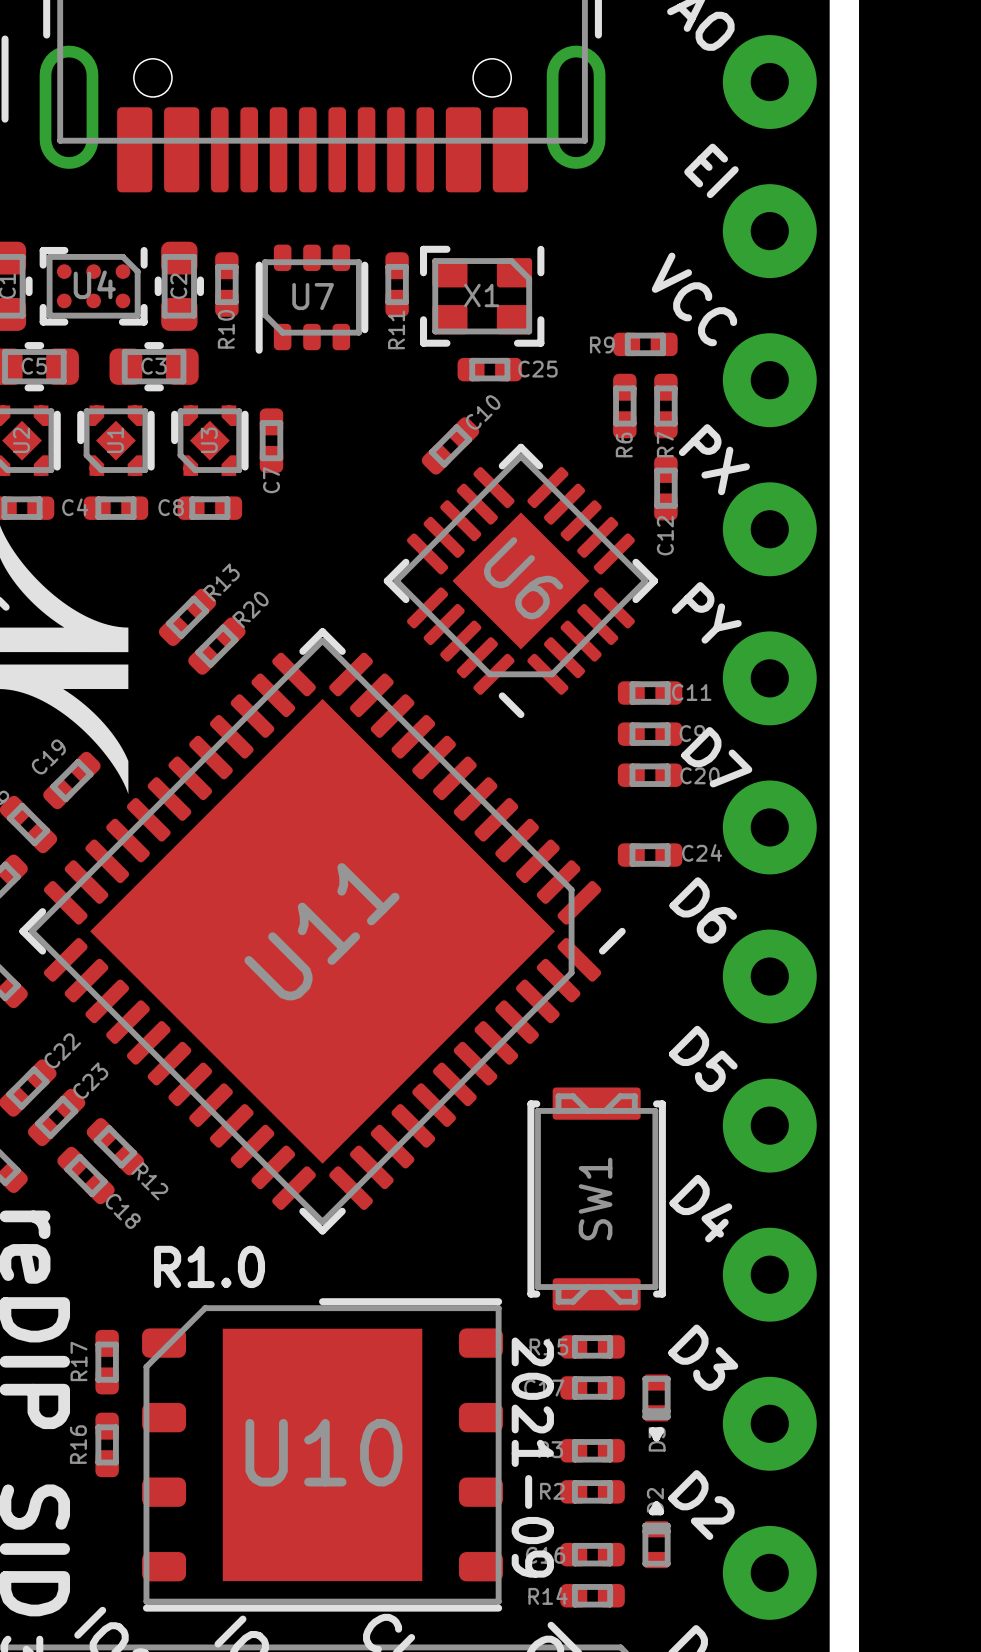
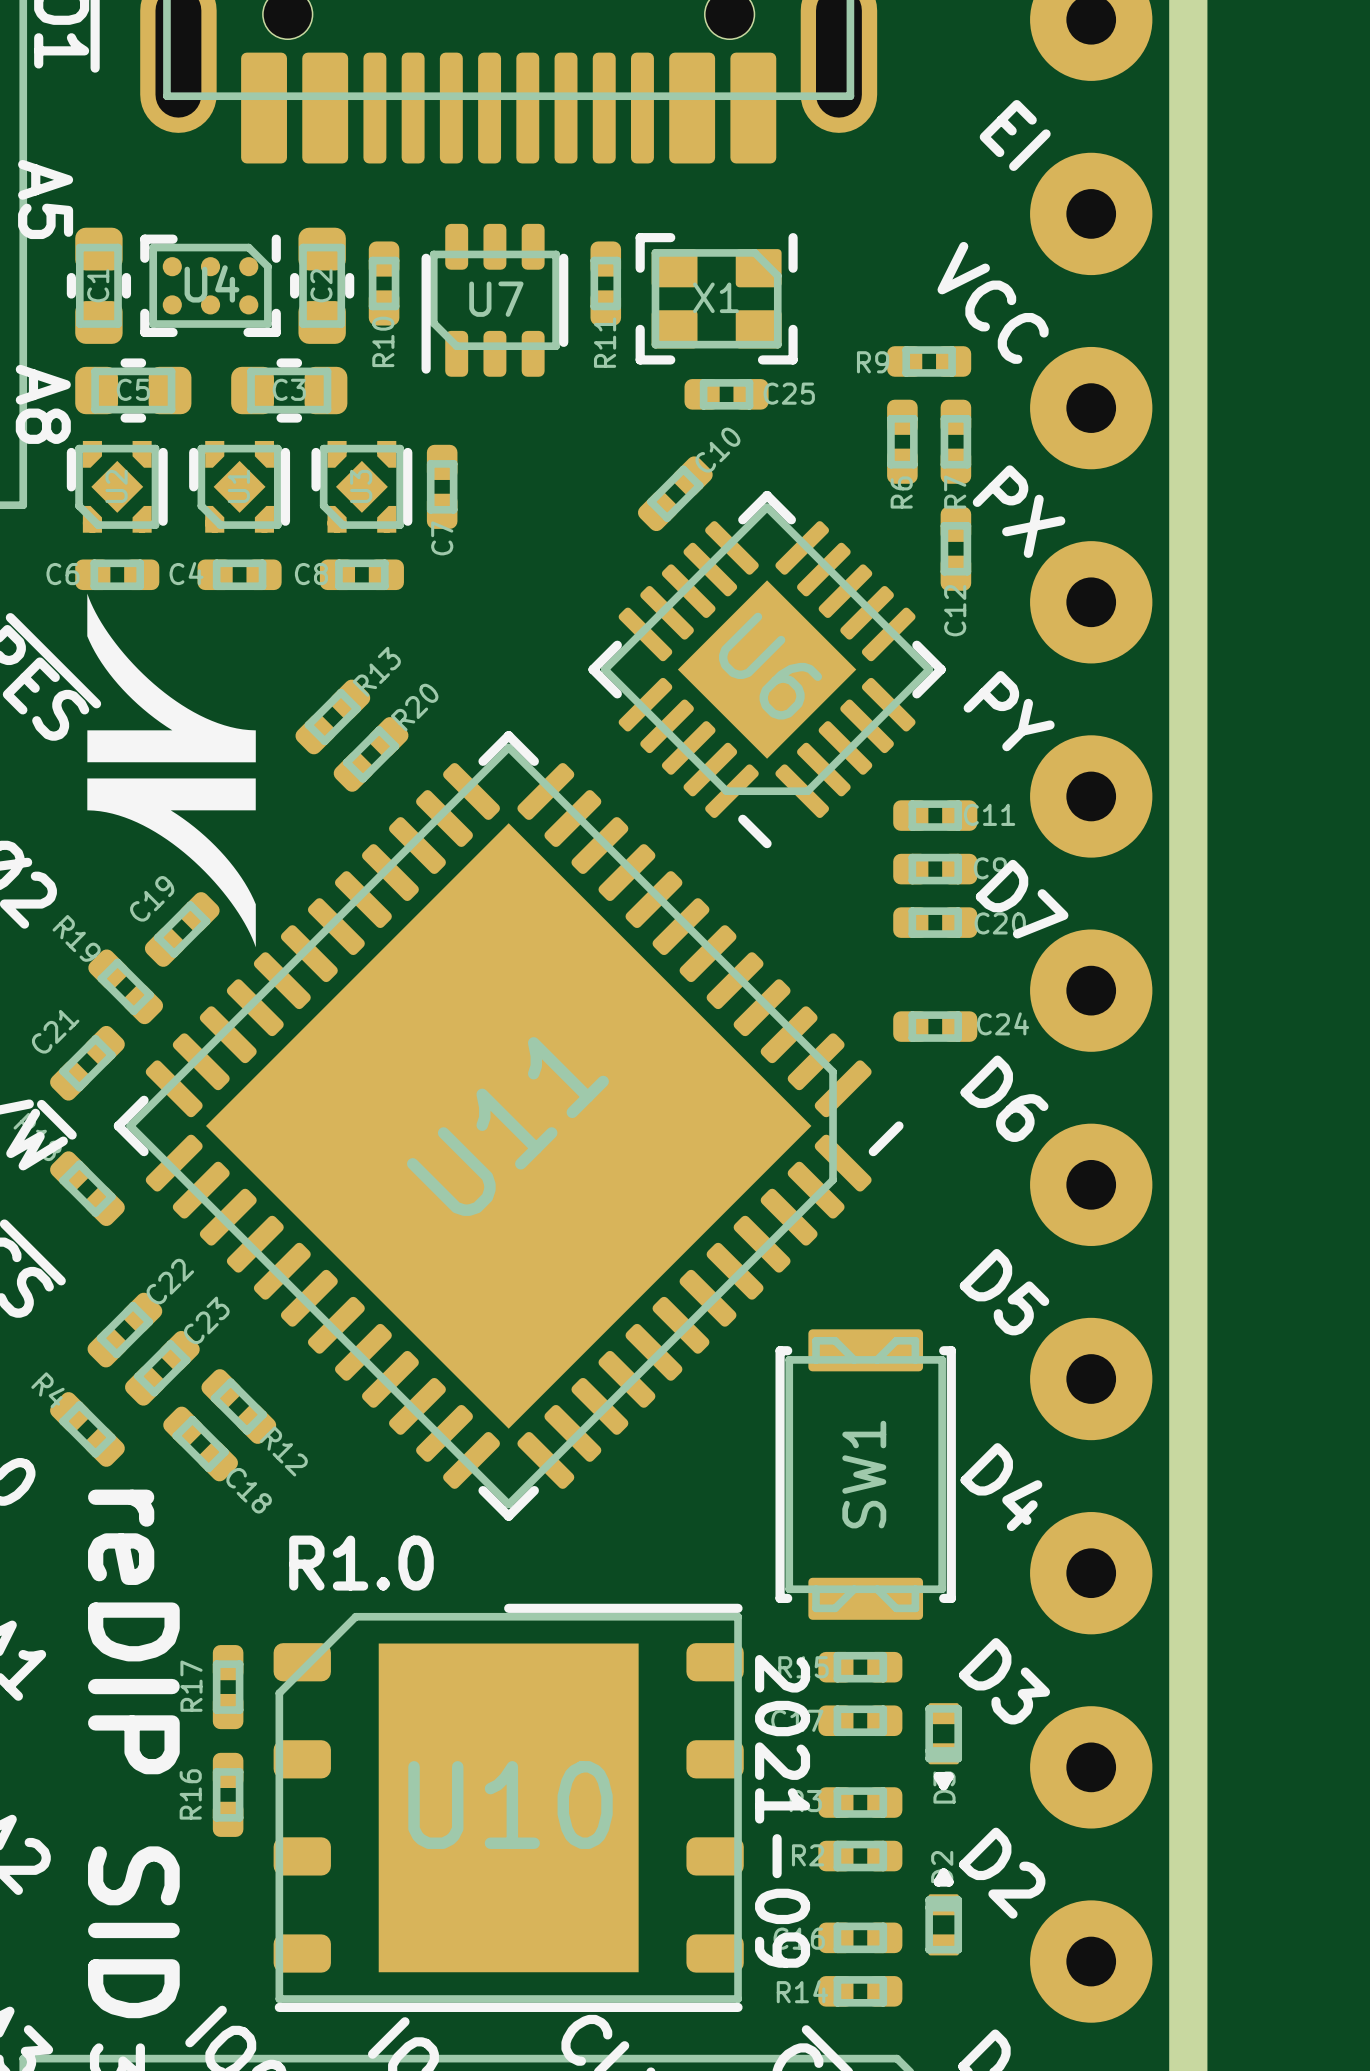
U7 footprint: [255, 244, 369, 354] -> [421, 223, 569, 377]

